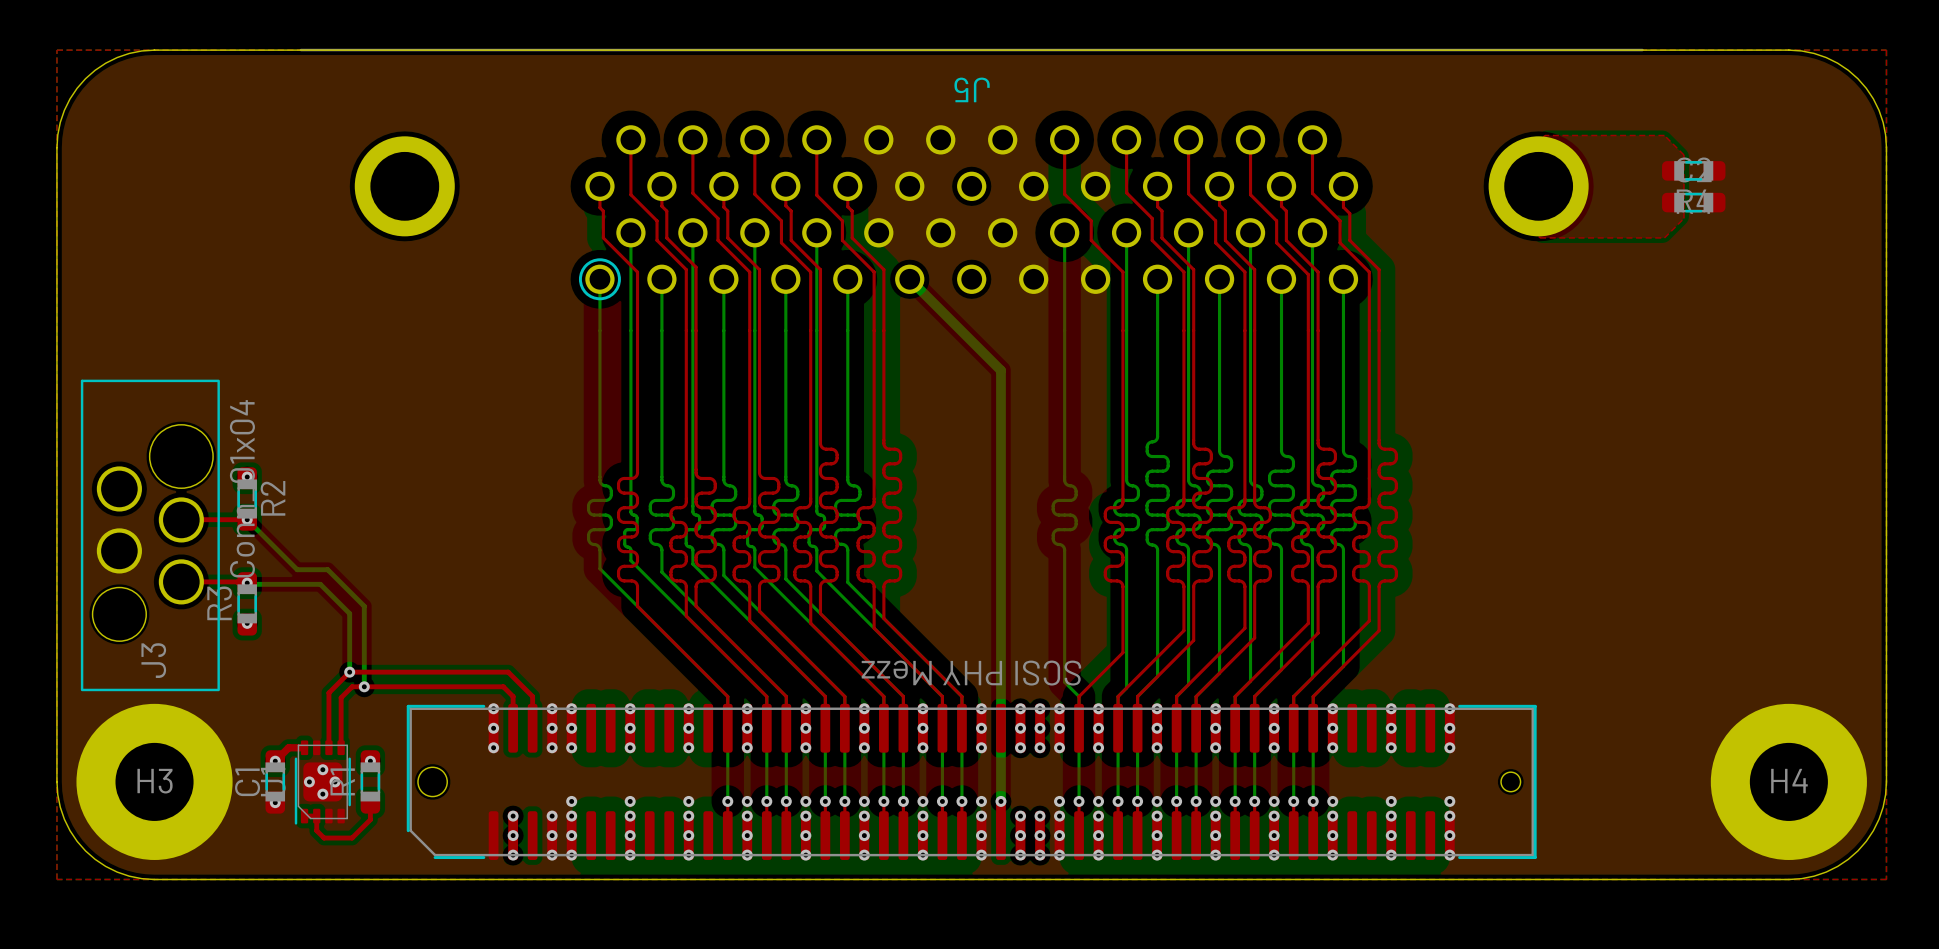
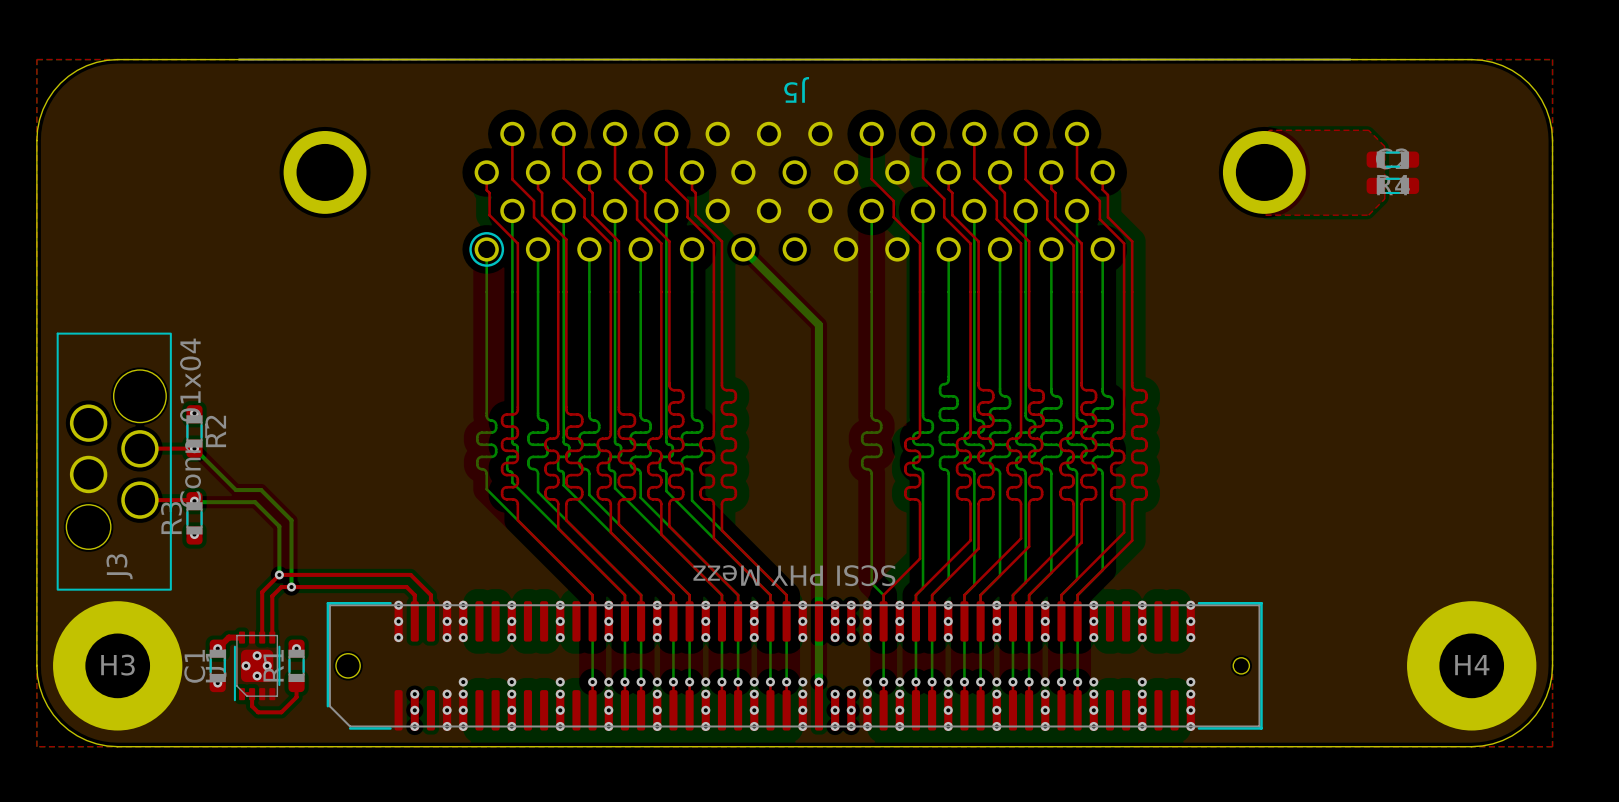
top track: (1254, 443) (1254, 469) -> (1029, 385) (1031, 389) (1040, 390) (1043, 395) (1041, 401) (1031, 403) (1029, 407)
top track: (1254, 472) (1254, 499) -> (1029, 409) (1031, 413) (1040, 415) (1043, 419) (1041, 425) (1031, 427) (1029, 431)

